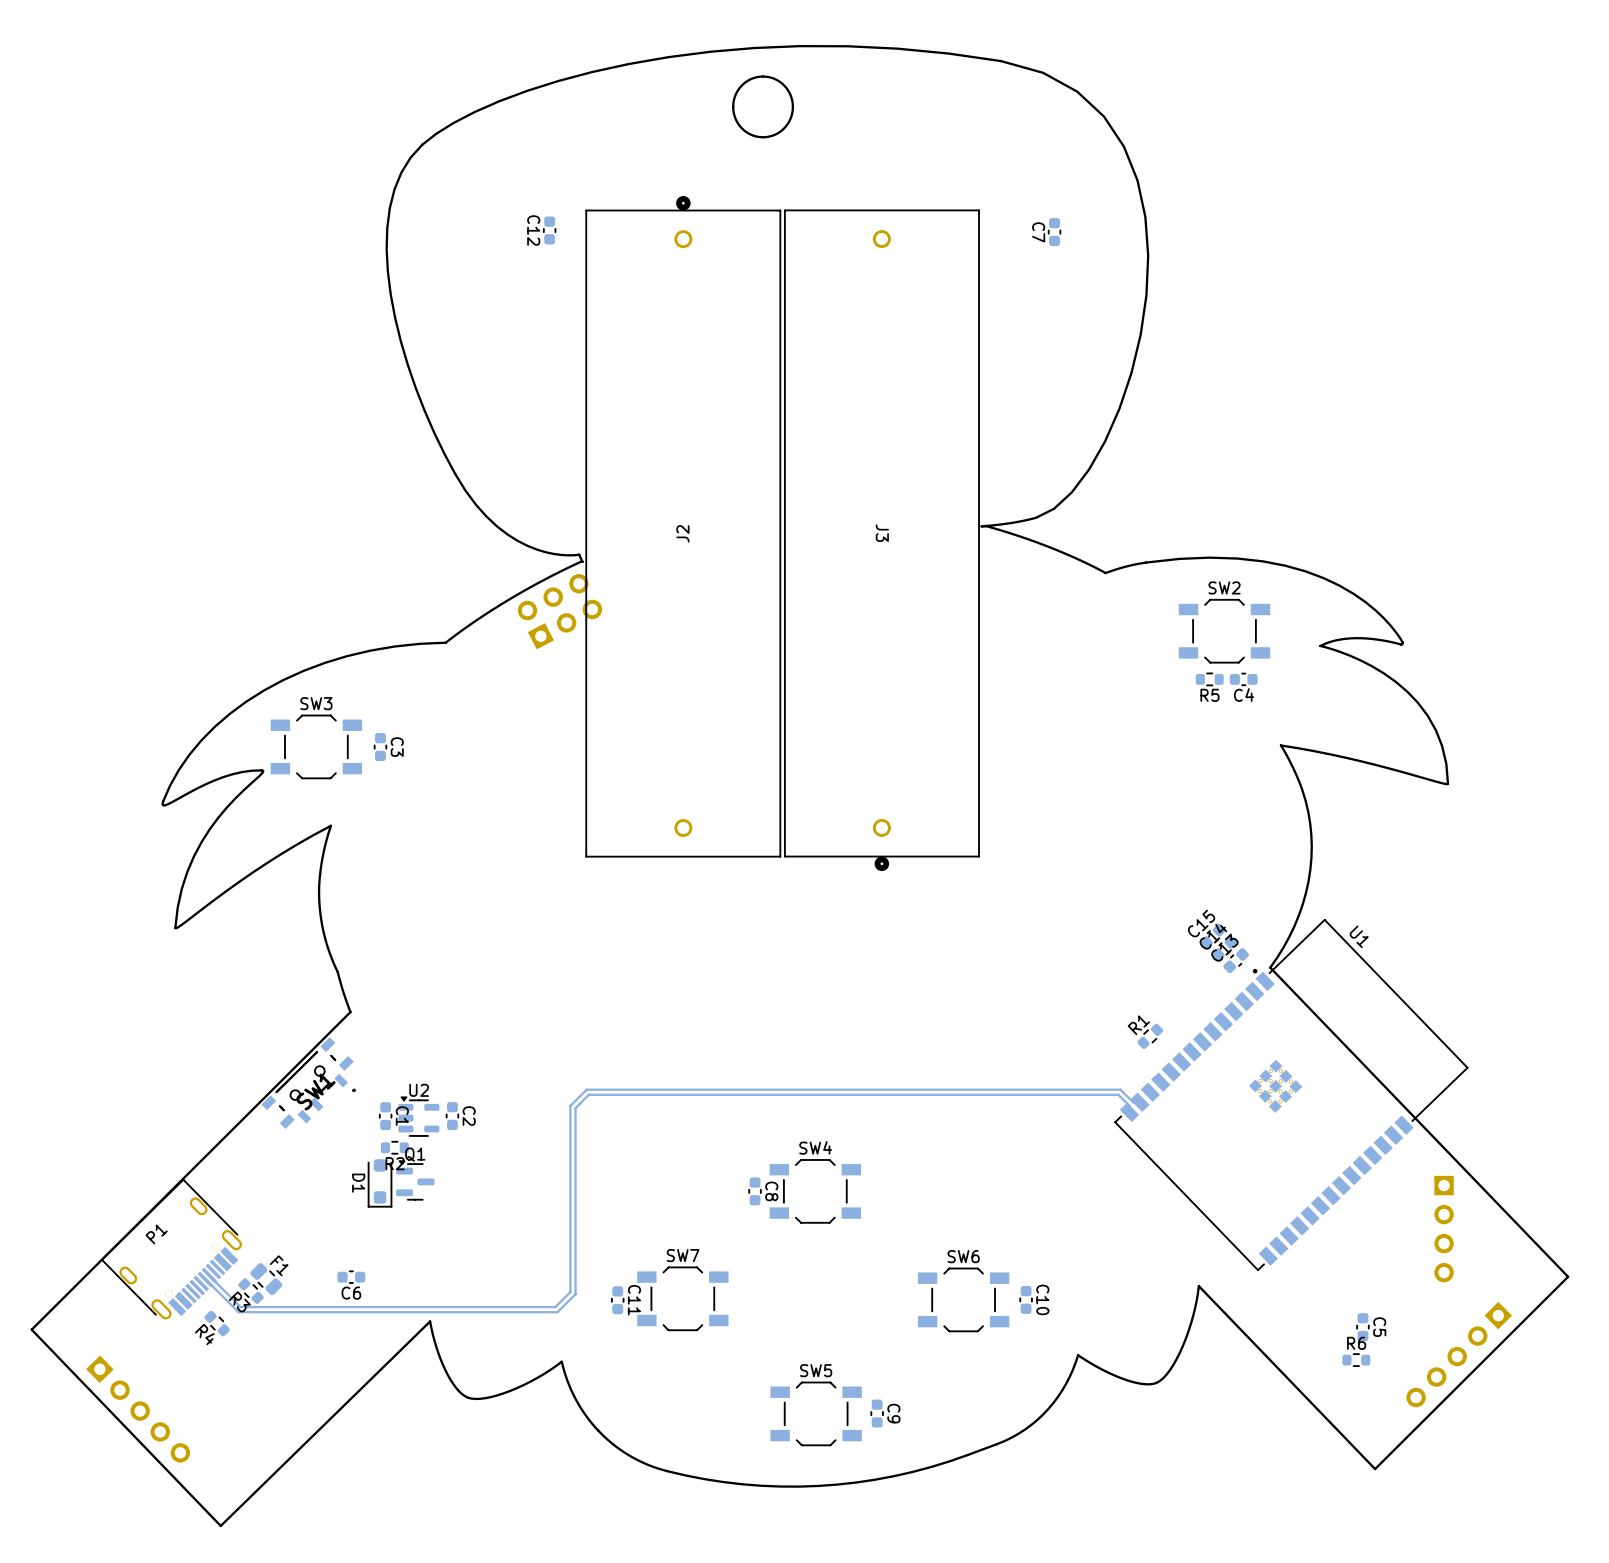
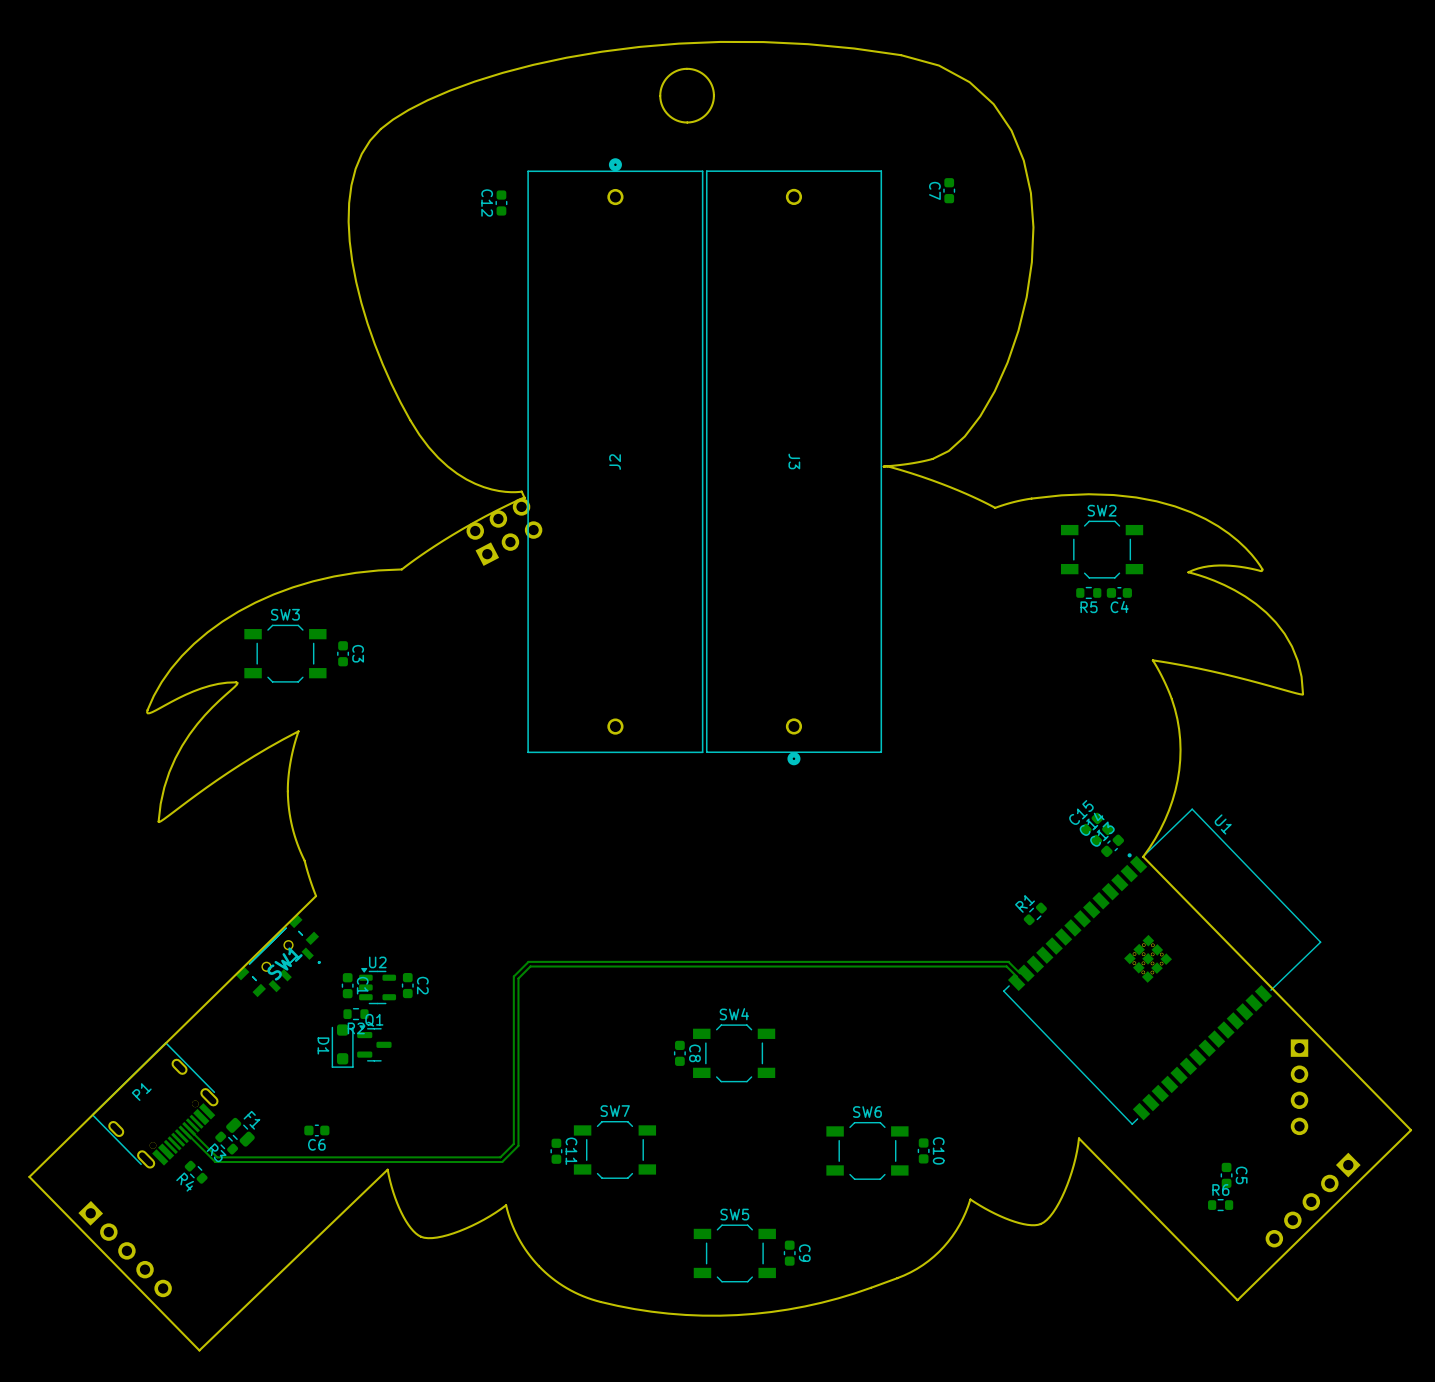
board edge: (1001, 61) (1043, 72) (1077, 91) (1103, 116) (1123, 146) (1137, 180) (1145, 217) (1148, 255) (1146, 295) (1140, 334) (1131, 372) (1119, 408) (1105, 441) (1089, 469) (1071, 492) (1054, 508) (1029, 519) (981, 526) (999, 529) (1046, 545) (1105, 573) (1146, 562) (1209, 557) (1237, 558) (1285, 565) (1323, 578) (1353, 593) (1375, 610) (1396, 632) (1402, 644) (1377, 639) (1355, 638) (1337, 640) (1320, 645) (1349, 655) (1371, 666) (1395, 681) (1417, 702) (1435, 729) (1442, 746) (1447, 783) (1345, 757) (1280, 745) (1295, 772) (1305, 800) (1310, 823) (1311, 858) (1308, 881) (1299, 915) (1289, 936) (1270, 967) (1568, 1276) (1375, 1469) (1198, 1286) (1193, 1316) (1182, 1345) (1170, 1370) (1156, 1383) (1141, 1383) (1122, 1378) (1078, 1355) (1066, 1383) (1053, 1402) (1031, 1424) (1011, 1437) (949, 1461) (912, 1471) (875, 1479) (818, 1485) (761, 1485) (723, 1482) (667, 1471) (638, 1460) (612, 1444) (588, 1419) (571, 1389) (561, 1361) (537, 1378) (510, 1390) (485, 1398) (467, 1397) (455, 1387) (445, 1369) (436, 1346) (430, 1321) (220, 1525) (31, 1329) (350, 1012) (326, 943) (319, 908) (320, 867) (330, 825) (267, 863) (176, 928) (181, 889) (187, 872) (201, 842) (226, 807) (263, 771) (251, 770) (232, 774) (205, 784) (168, 804) (163, 805) (163, 801) (178, 770) (201, 740) (229, 713) (264, 690) (303, 670) (347, 656) (394, 646) (445, 642) (513, 597) (582, 561) (579, 554) (553, 553) (527, 545) (496, 526) (465, 490) (434, 432) (407, 364) (390, 294) (386, 249) (387, 228) (394, 189) (401, 172) (410, 157) (422, 144) (453, 123) (474, 112) (527, 90) (558, 81) (628, 64) (710, 51) (800, 46) (897, 48) (1001, 61) -> (901, 55) (939, 65) (969, 82) (993, 104) (1011, 130) (1023, 160) (1030, 193) (1033, 227) (1031, 262) (1026, 297) (1018, 330) (1007, 362) (994, 391) (980, 416) (964, 436) (948, 451) (927, 460) (883, 466) (899, 469) (941, 483) (995, 507) (1031, 498) (1088, 494) (1113, 495) (1156, 501) (1191, 512) (1218, 526) (1237, 540) (1256, 560) (1261, 570) (1219, 565) (1203, 567) (1188, 572) (1214, 580) (1234, 590) (1255, 603) (1275, 622) (1292, 646) (1297, 660) (1303, 694) (1211, 671) (1152, 660) (1165, 684) (1174, 709) (1179, 729) (1180, 760) (1177, 780) (1169, 810) (1160, 829) (1143, 856) (1411, 1130) (1237, 1300) (1078, 1138) (1073, 1164) (1064, 1191) (1053, 1212) (1040, 1224) (1027, 1224) (1009, 1220) (970, 1199) (959, 1224) (948, 1241) (928, 1260) (910, 1272) (854, 1293) (821, 1302) (788, 1309) (737, 1315) (685, 1314) (651, 1311) (600, 1302) (574, 1292) (551, 1278) (530, 1256) (514, 1230) (506, 1205) (483, 1219) (459, 1231) (437, 1237) (420, 1236) (410, 1228) (401, 1212) (387, 1169) (199, 1350) (29, 1176) (316, 896) (294, 835) (288, 804) (289, 768) (298, 731) (241, 764) (159, 822) (164, 787) (182, 745) (204, 715) (237, 682) (209, 685) (185, 694) (152, 712) (147, 713) (147, 710) (161, 682) (181, 655) (207, 632) (238, 611) (273, 594) (313, 581) (355, 572) (401, 569) (462, 529) (524, 498) (521, 491) (499, 491) (475, 483) (447, 466) (419, 434) (391, 383) (367, 323) (352, 261) (348, 221) (349, 203) (355, 168) (361, 153) (380, 128) (408, 109) (427, 100) (502, 72) (566, 57) (639, 46) (720, 41) (808, 44) (901, 55)
board edge: (762, 76) (774, 78) (784, 85) (790, 94) (792, 106) (790, 118) (784, 128) (774, 134) (763, 137) (751, 134) (742, 128) (735, 118) (733, 107) (735, 95) (741, 85) (751, 79) (762, 76) -> (686, 68) (697, 70) (705, 76) (711, 85) (713, 95) (711, 105) (706, 114) (697, 120) (687, 122) (676, 120) (668, 114) (662, 106) (660, 95) (662, 85) (667, 76) (676, 71) (686, 68)
C12 position: (549, 230) -> (501, 203)

